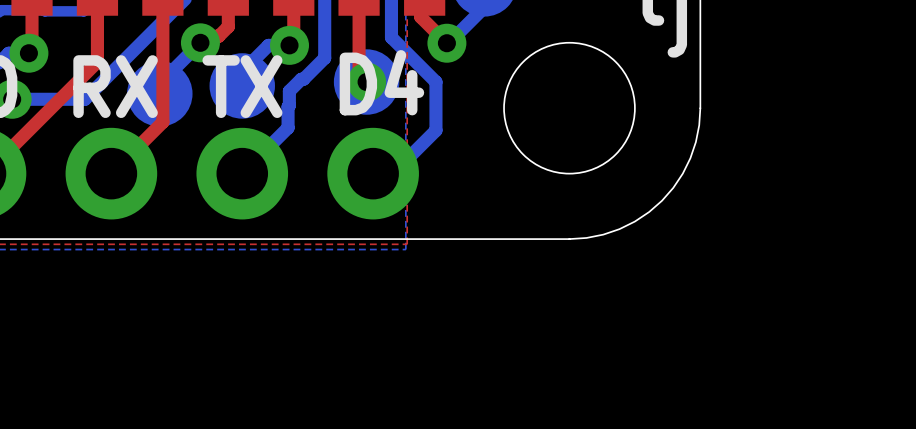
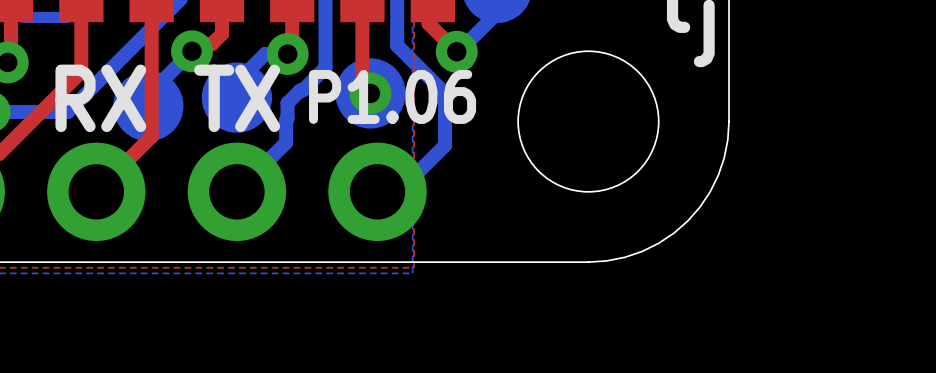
text: D4 (381, 82) -> P1.06 (392, 96)

